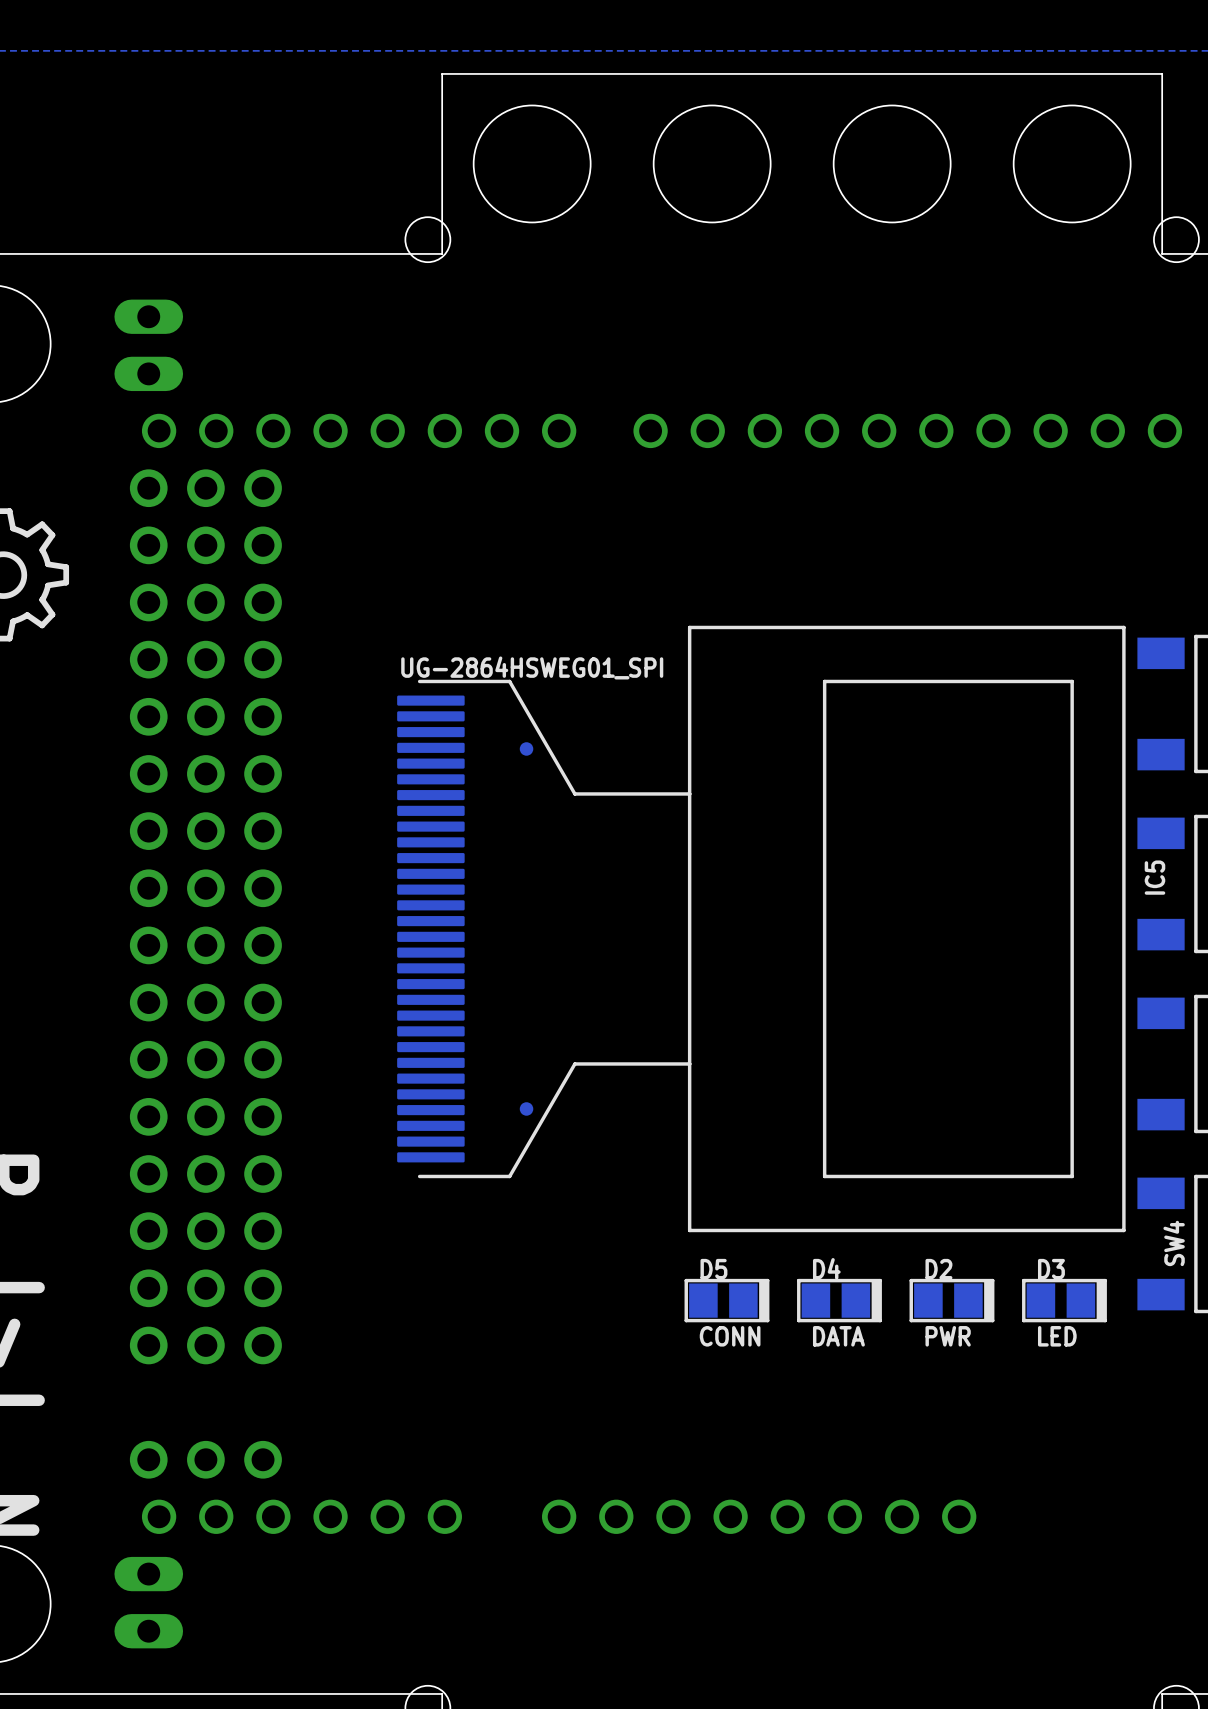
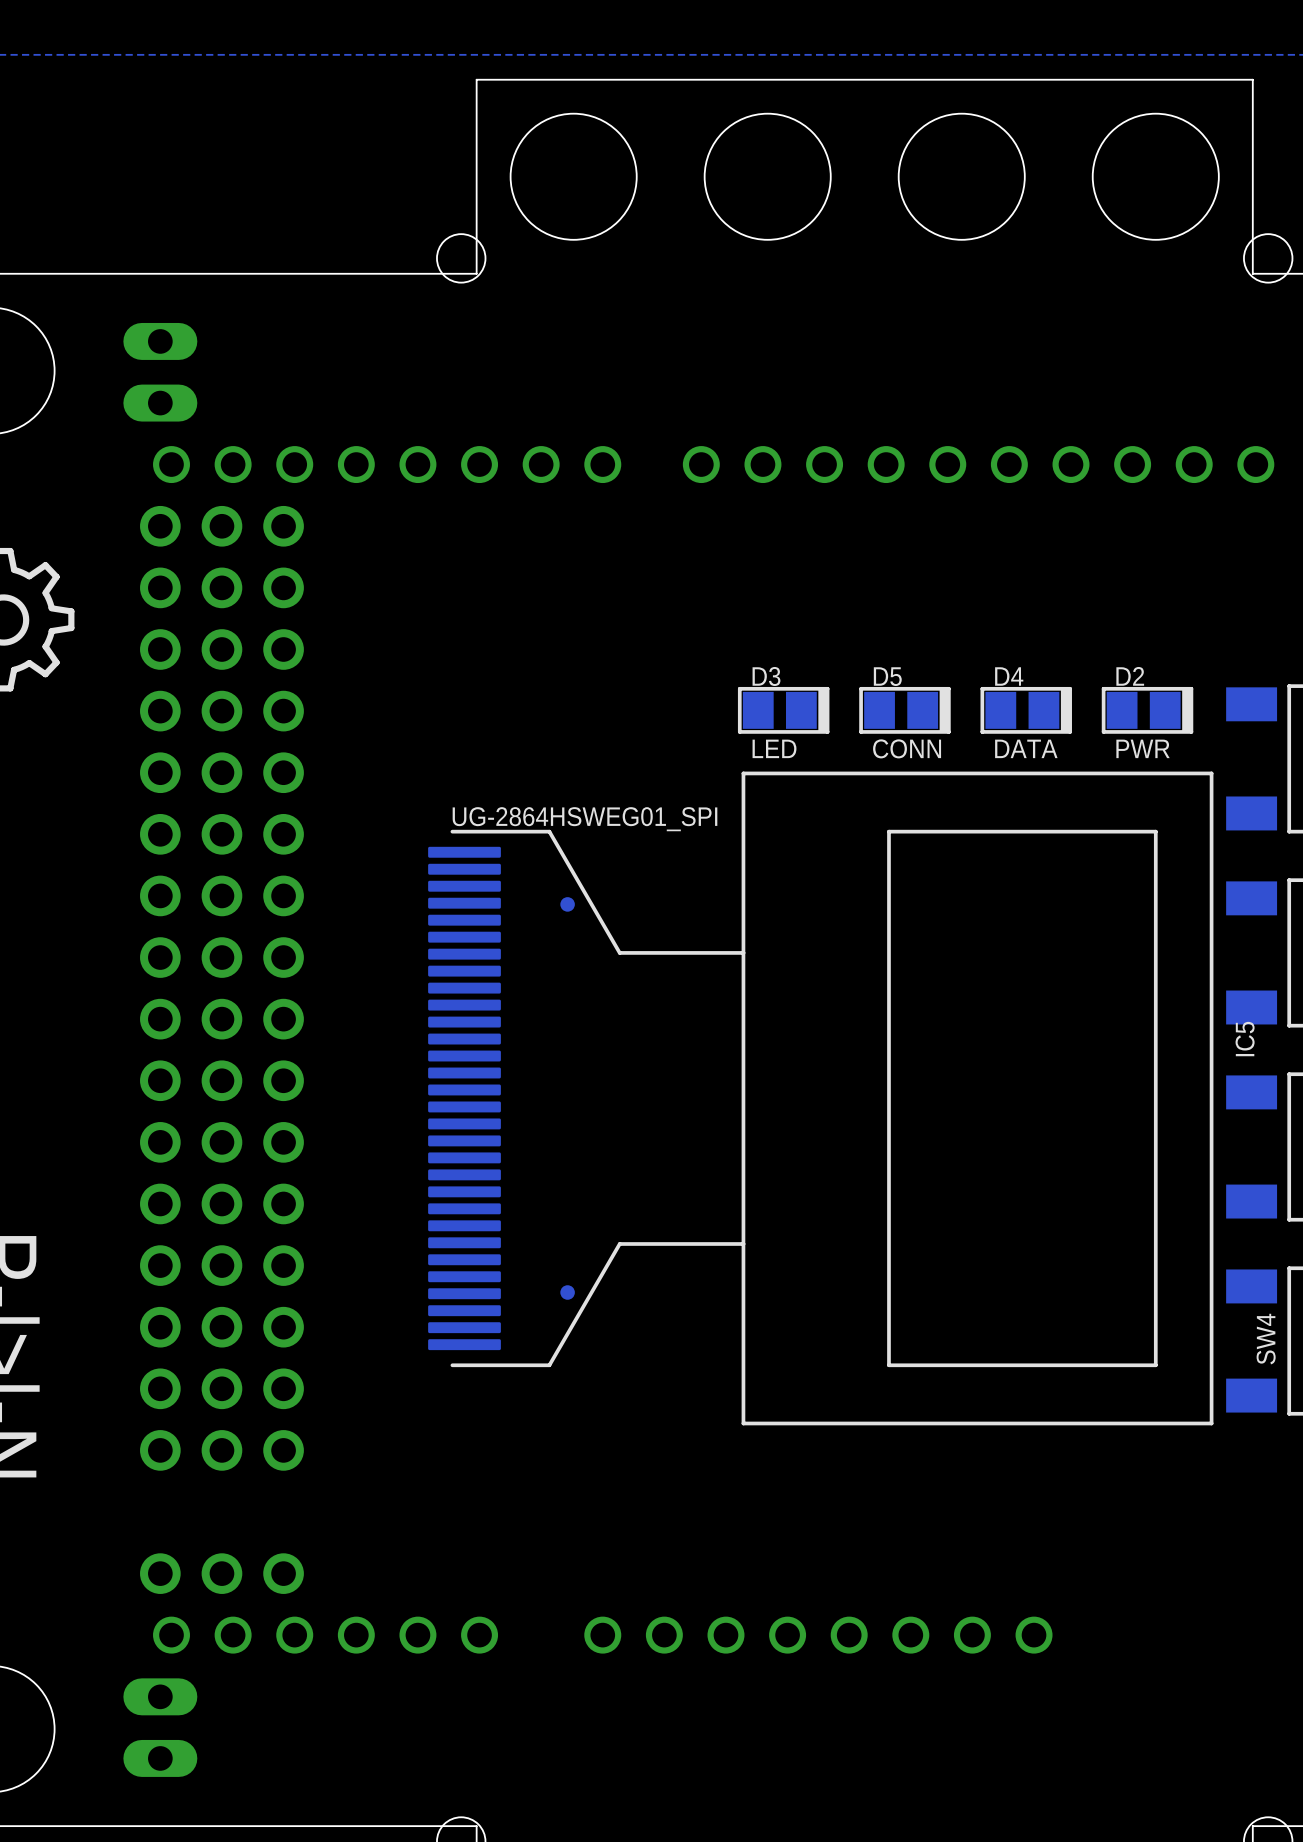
IC5 position: (761, 928) -> (820, 1098)
D5 position: (726, 1300) -> (904, 710)
D4 position: (839, 1300) -> (1026, 710)
D2 position: (951, 1300) -> (1147, 710)
D3 position: (1064, 1300) -> (783, 710)

